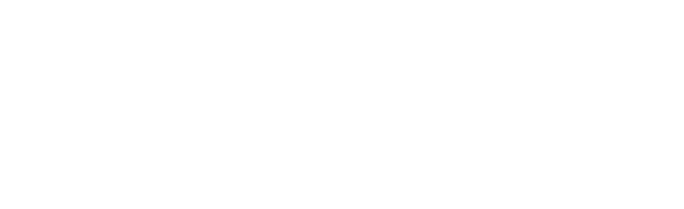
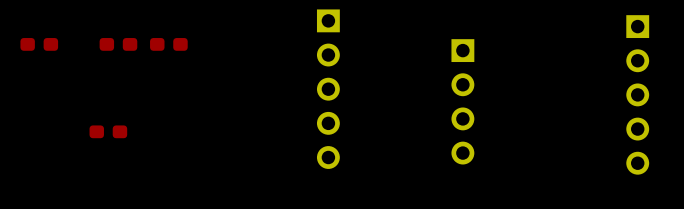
part: none -> (39, 44)
part: none -> (118, 44)
part: none -> (168, 44)
part: none -> (328, 89)
part: none -> (637, 94)
part: none -> (462, 101)
part: none -> (108, 131)

